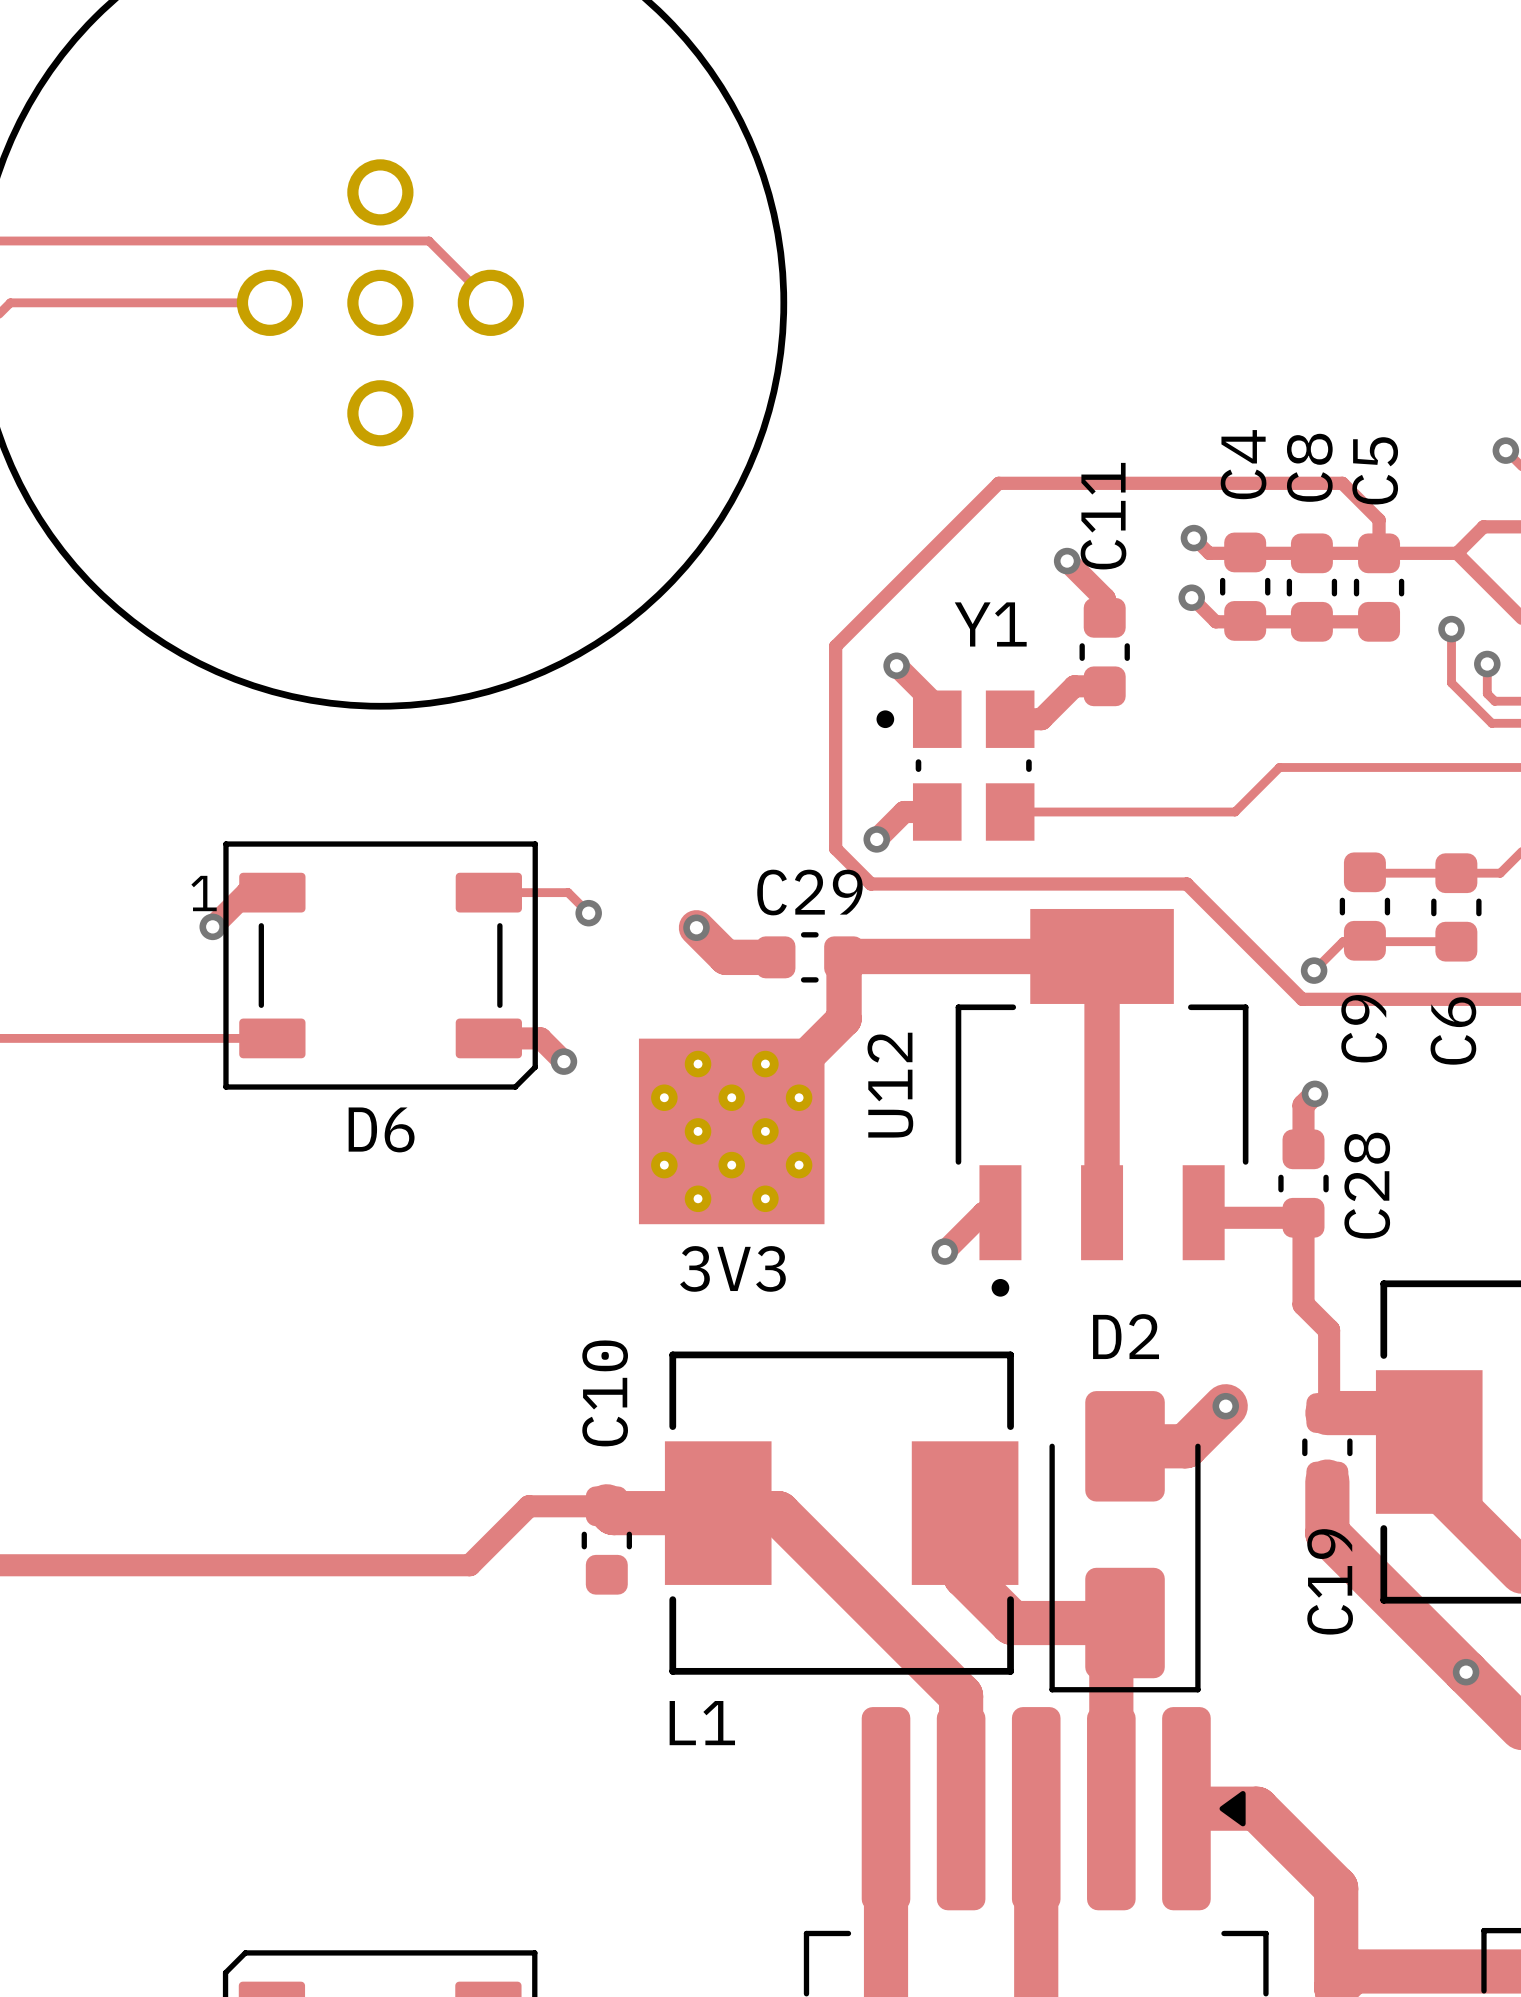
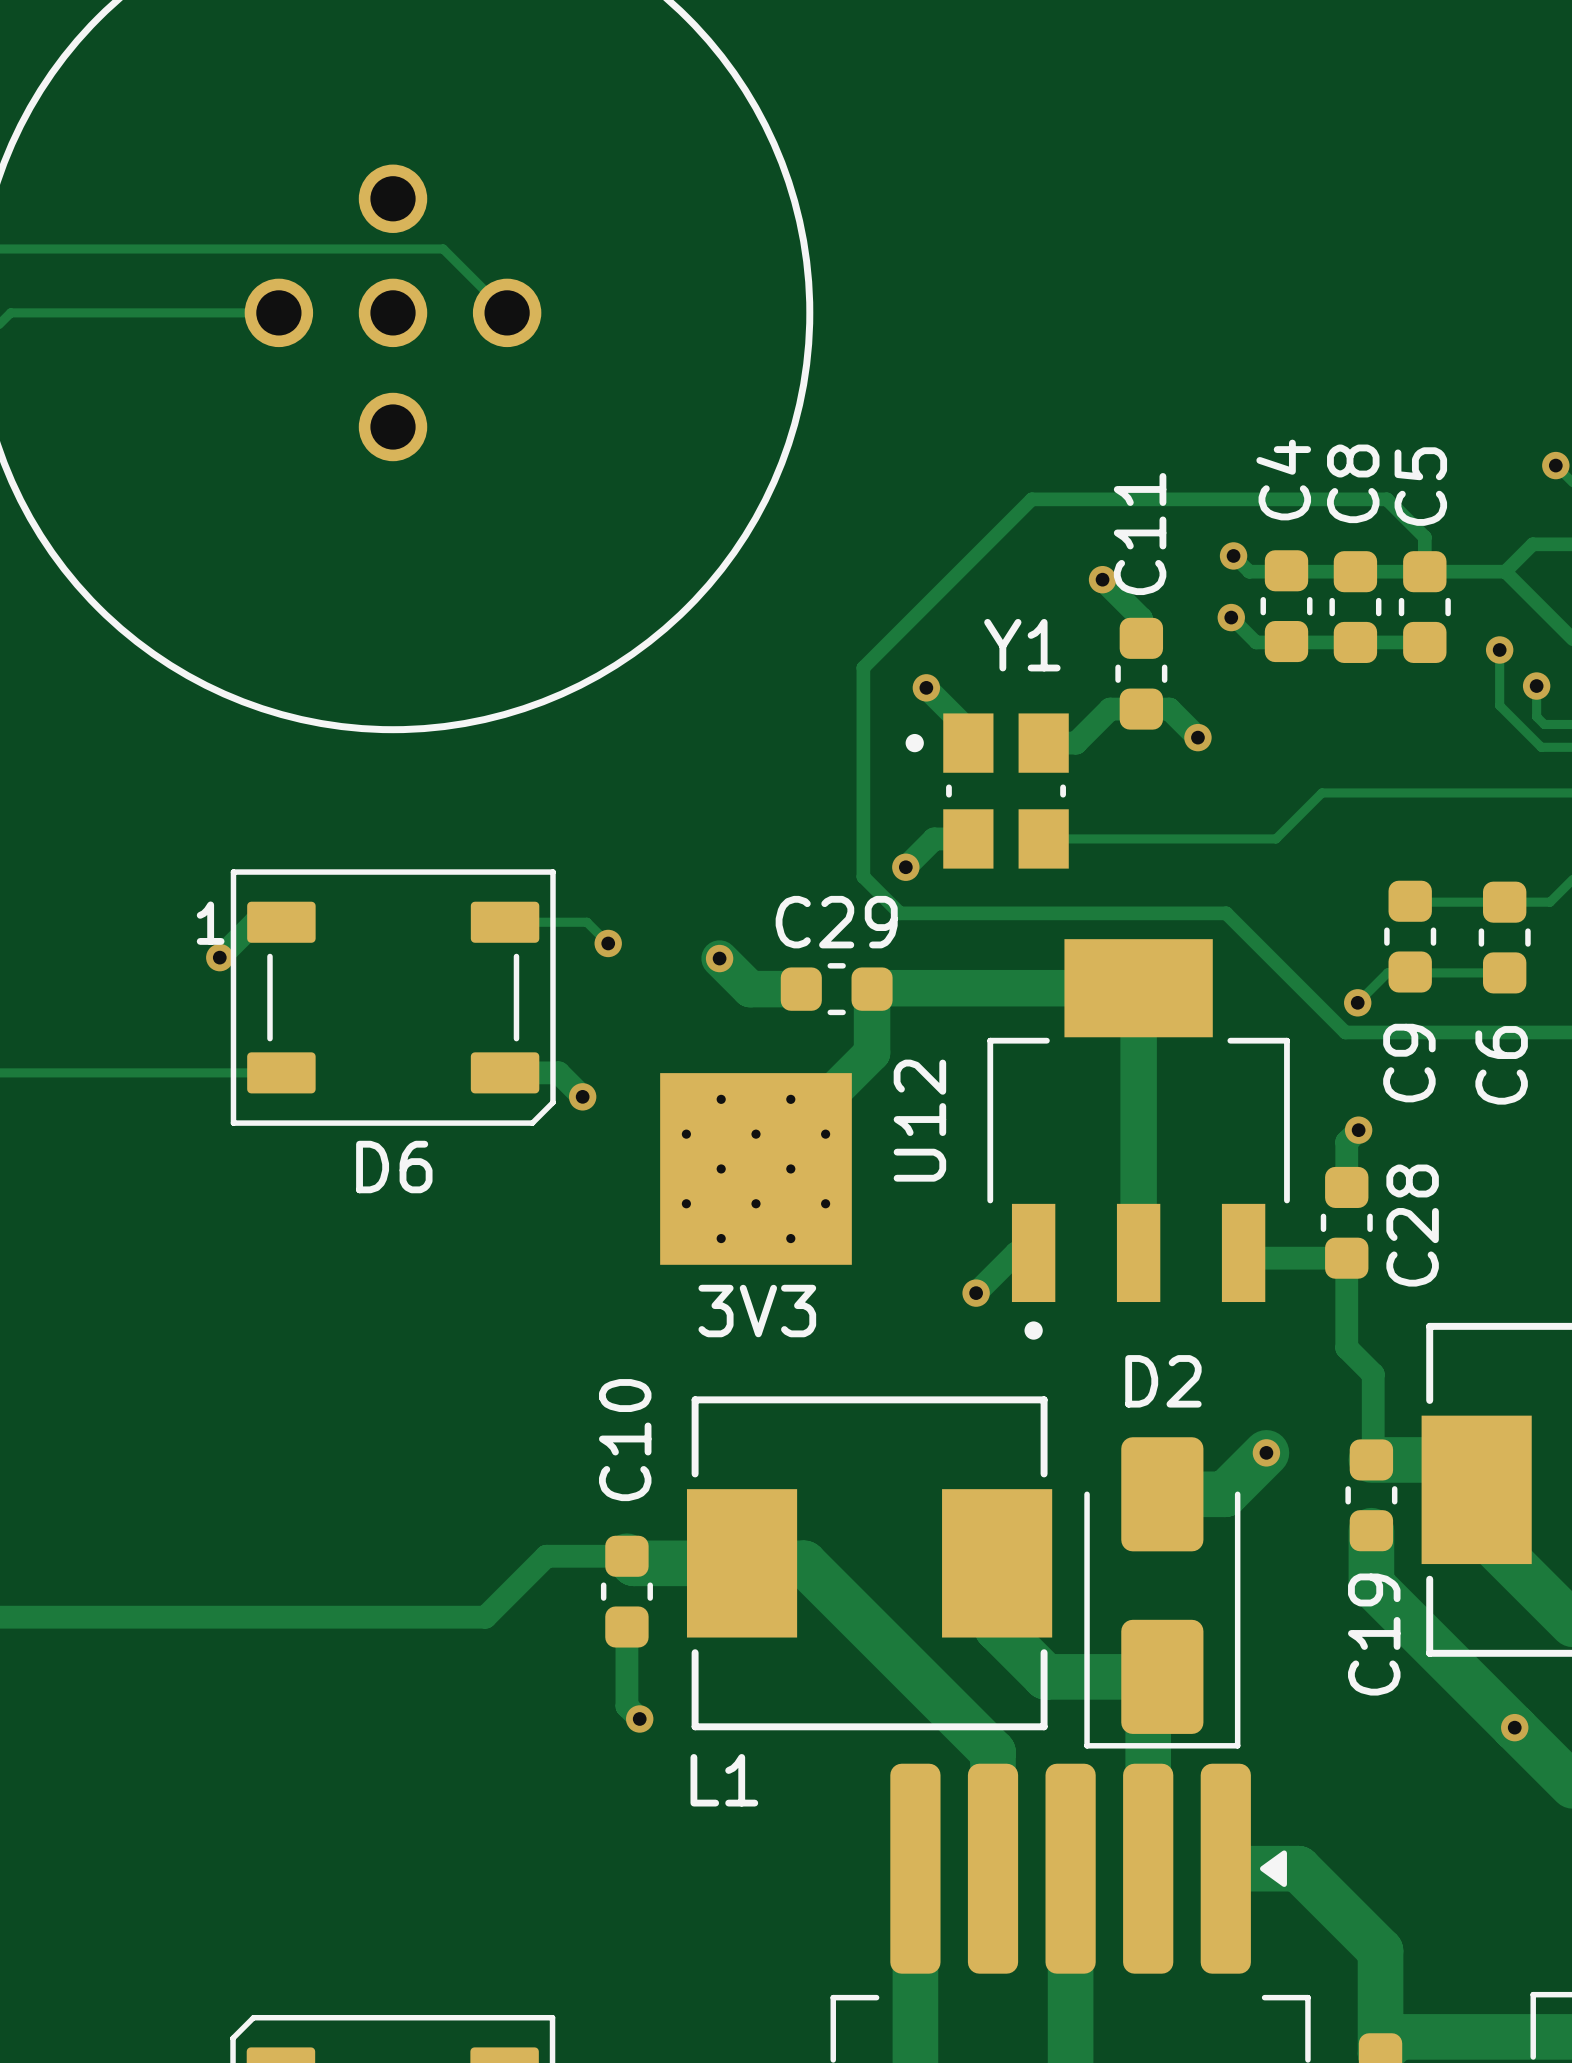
track: none -> (1141, 709) (1169, 709) (1197, 737)
via: none -> (1197, 737)
track: none -> (626, 1627) (626, 1706) (639, 1718)
via: none -> (639, 1718)

